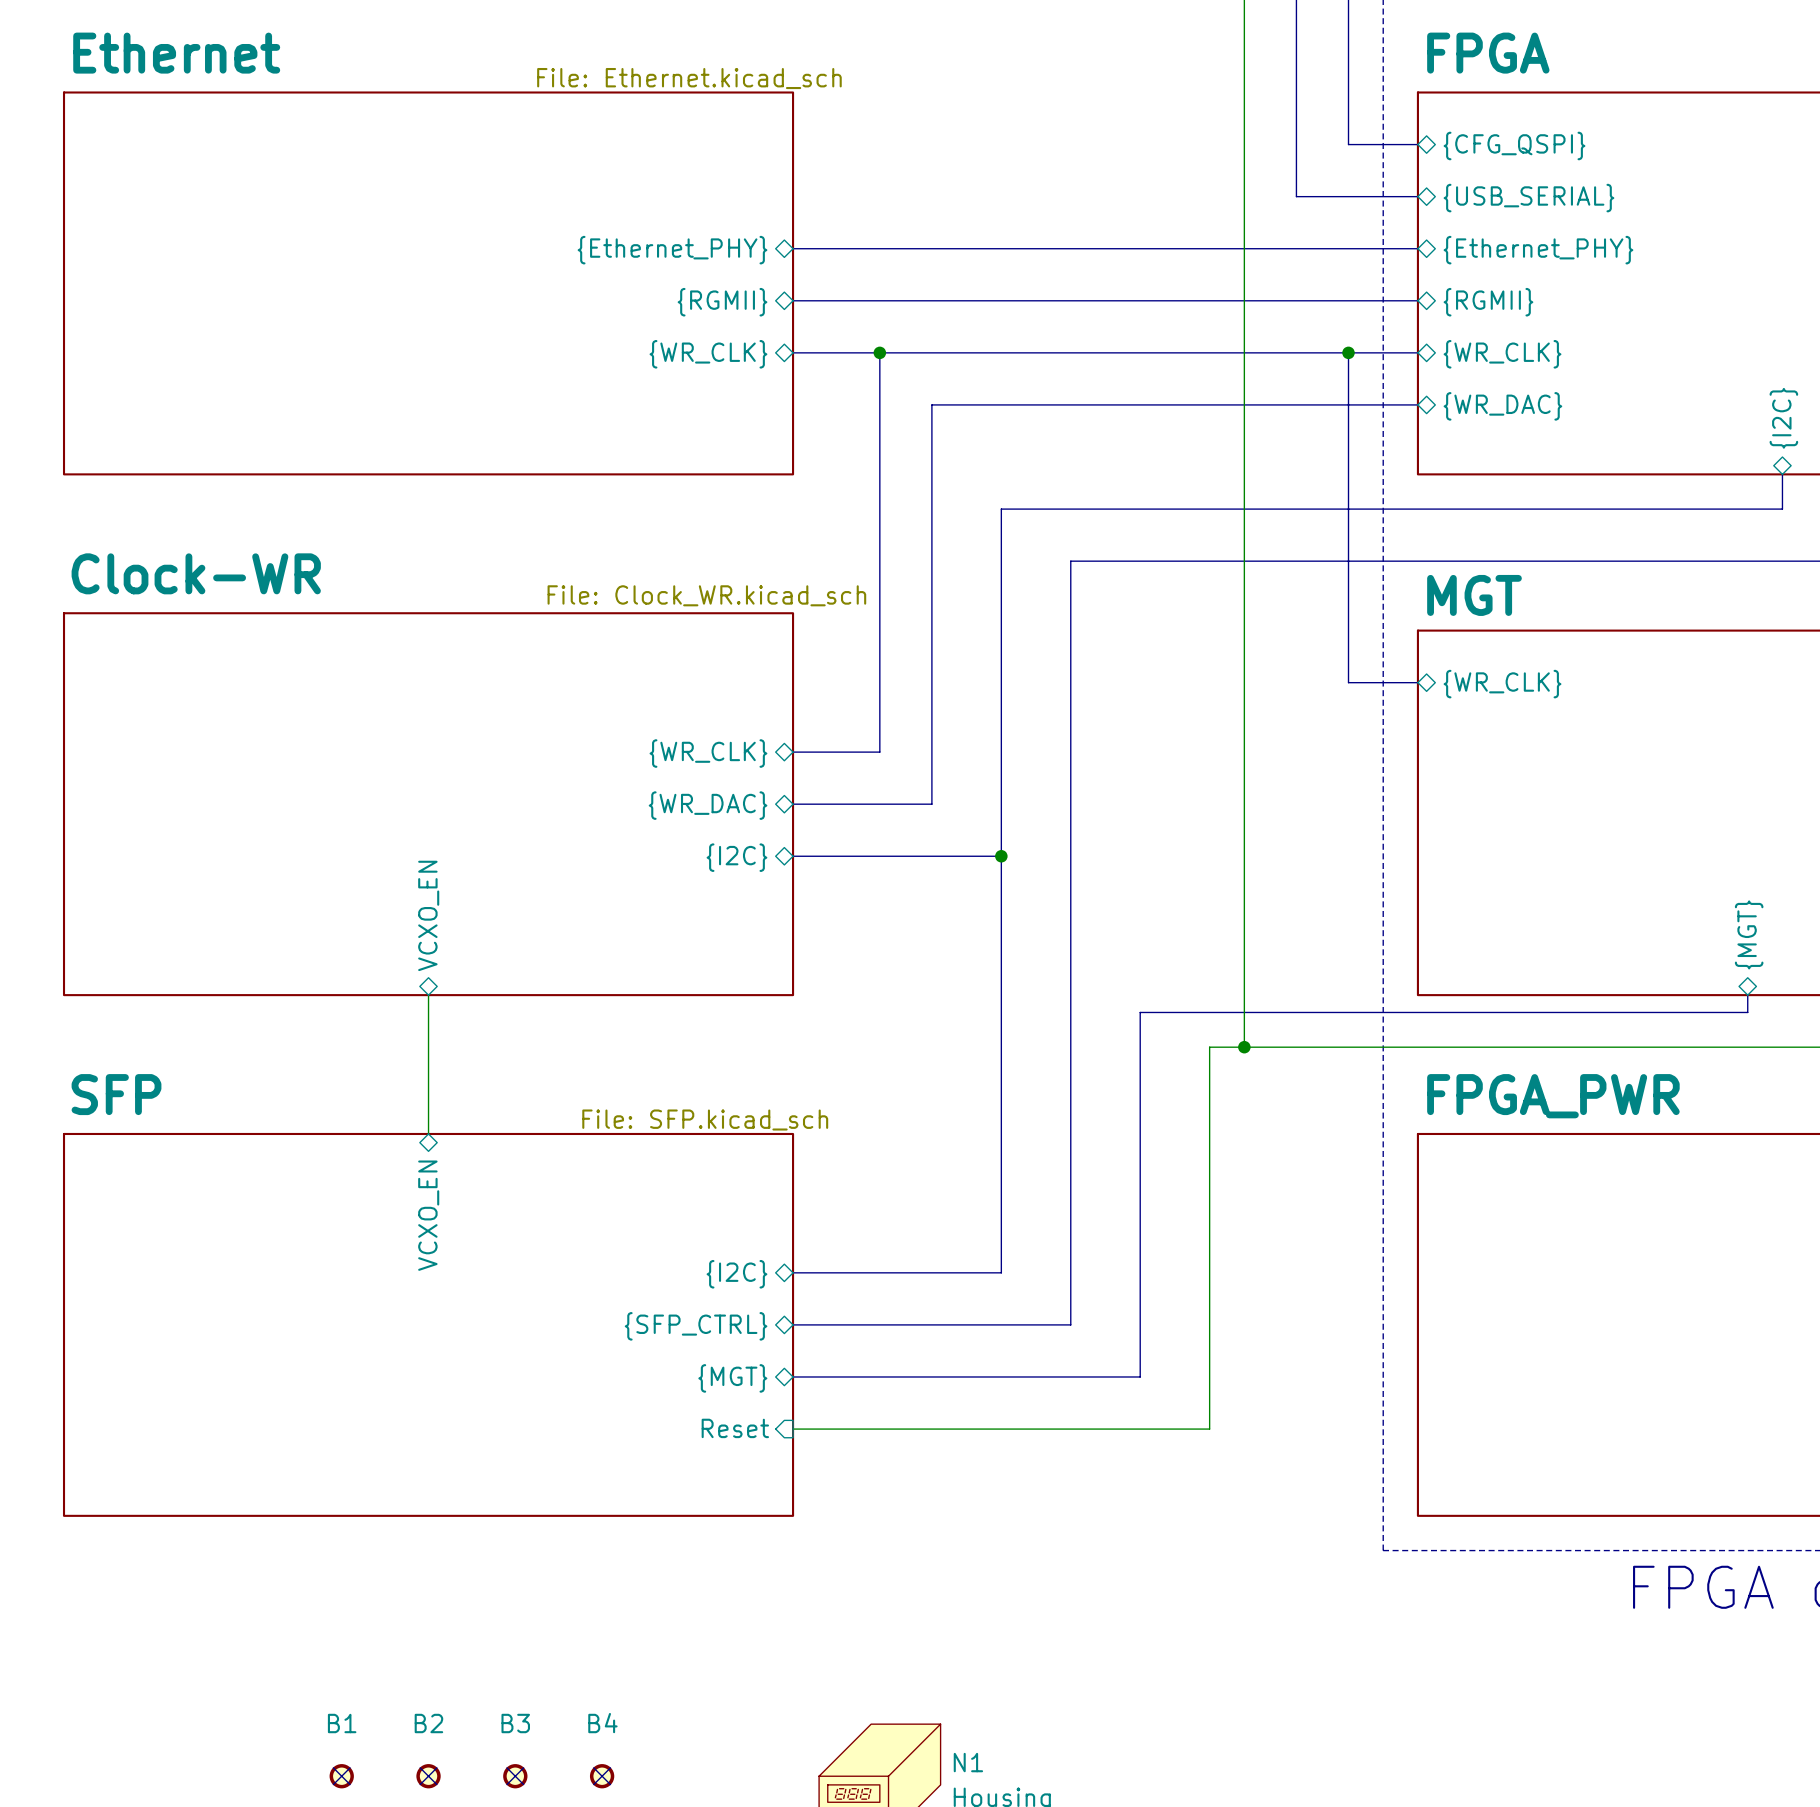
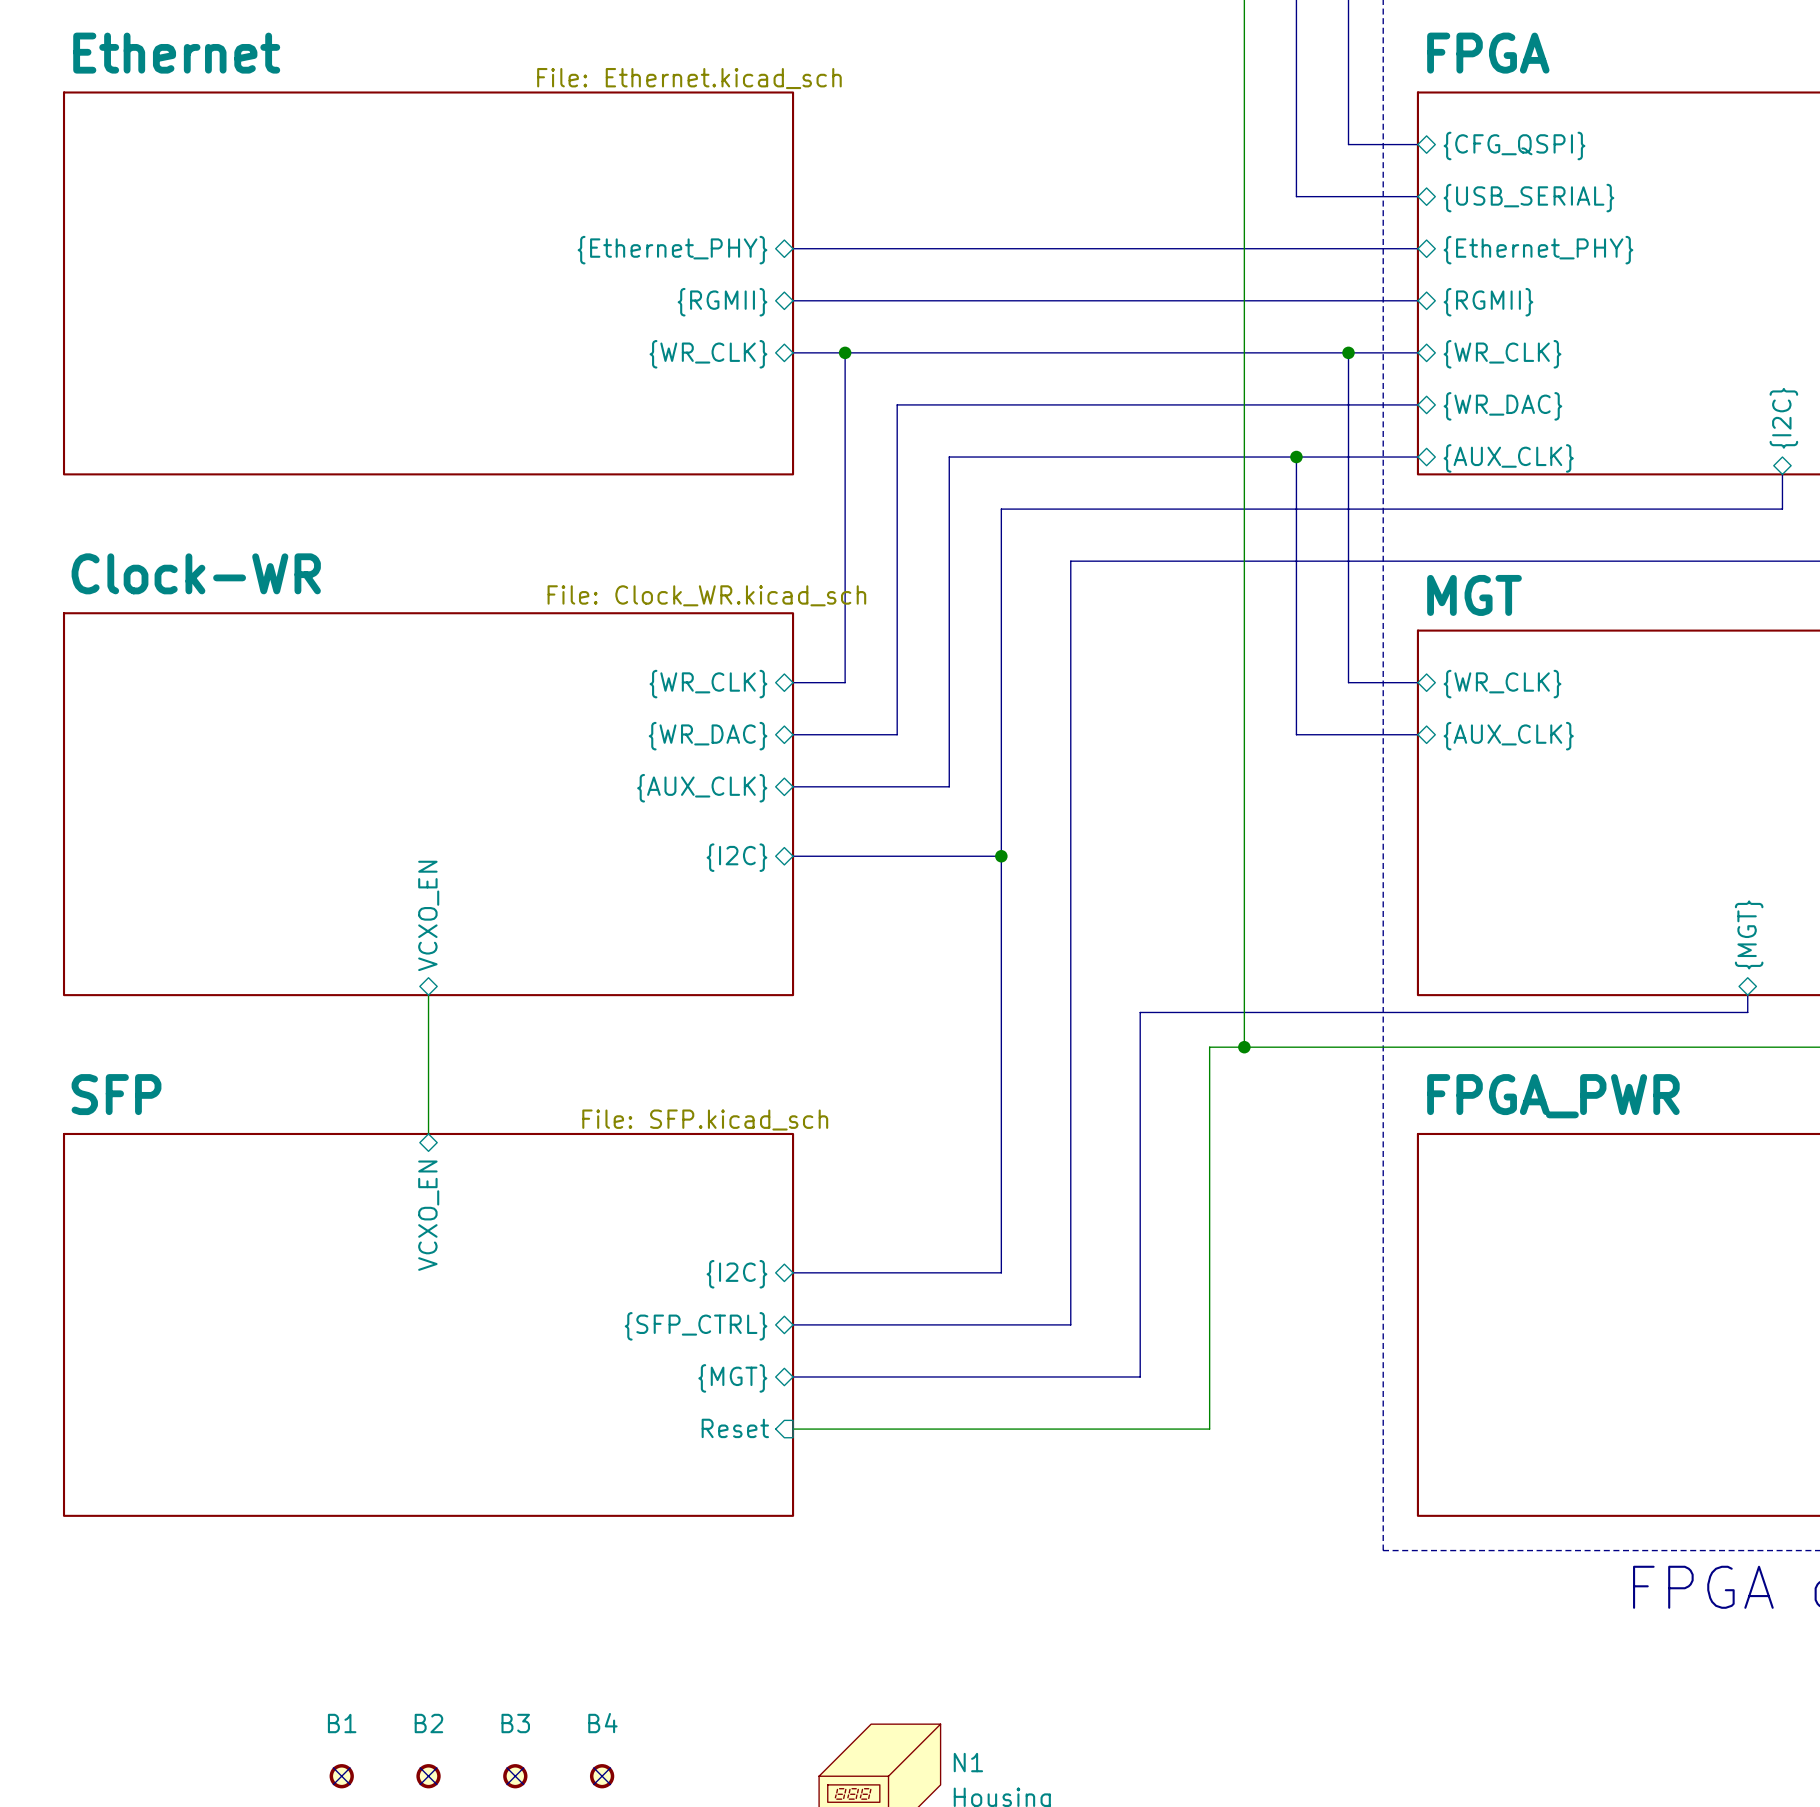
bus: none -> (845, 352) (845, 682) (793, 682)
bus: (879, 352) (879, 752) (793, 752) -> none
junction position: (879, 352) -> (845, 352)
bus: (931, 404) (931, 804) (793, 804) -> (931, 404) (897, 404) (897, 734) (793, 734)
bus: none -> (1296, 457) (1296, 734) (1417, 734)
junction: none -> (1296, 457)
bus: none -> (1417, 457) (949, 457) (949, 786) (793, 786)
sheet pin: none -> {AUX_CLK} (1508, 458)
sheet pin: none -> {AUX_CLK} (1508, 736)
sheet pin position: {WR_CLK} (708, 753) -> {WR_CLK} (708, 684)
sheet pin: none -> {AUX_CLK} (702, 788)
sheet pin position: {WR_DAC} (708, 805) -> {WR_DAC} (708, 736)

